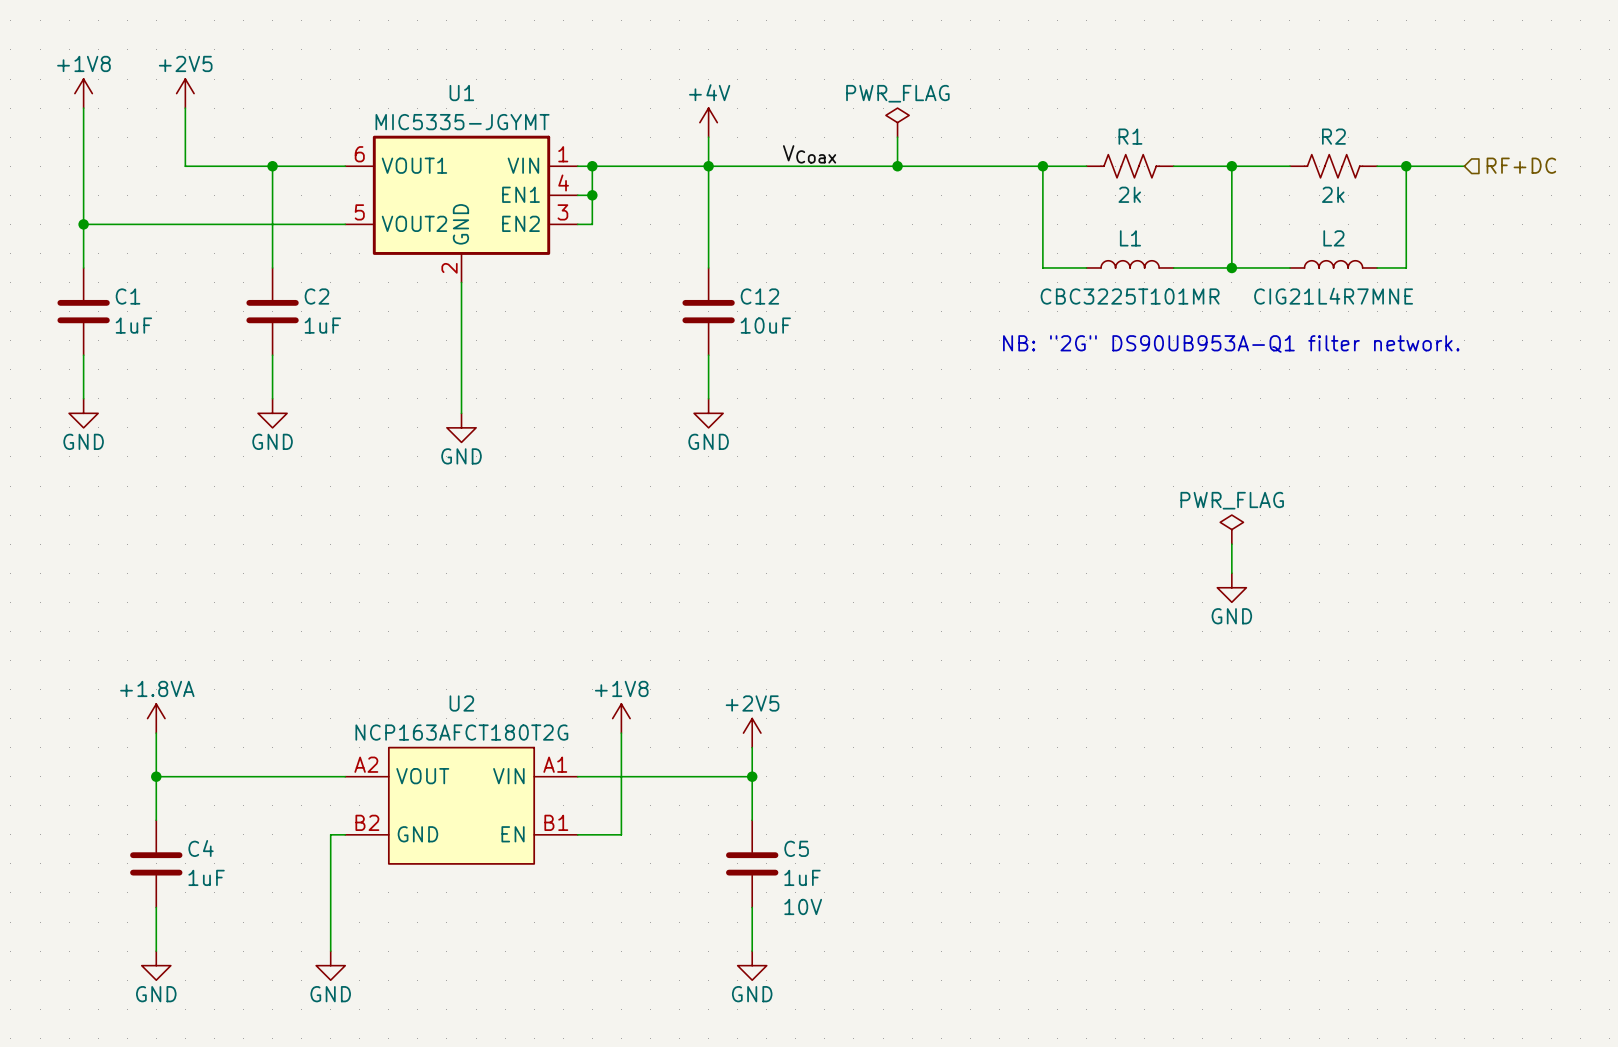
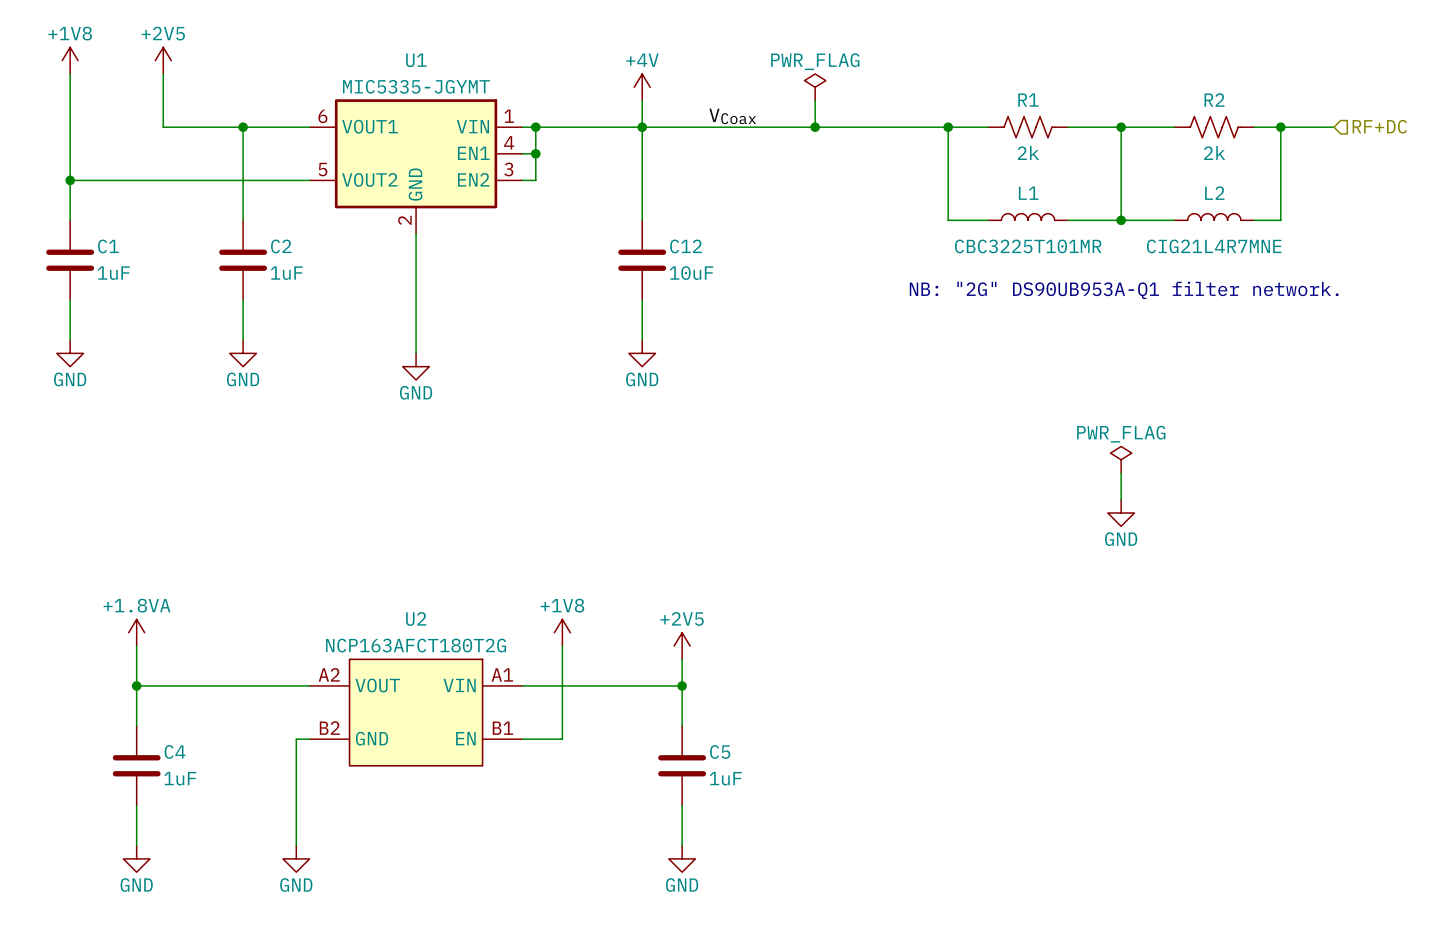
C5 text: 10V (803, 906) -> none

